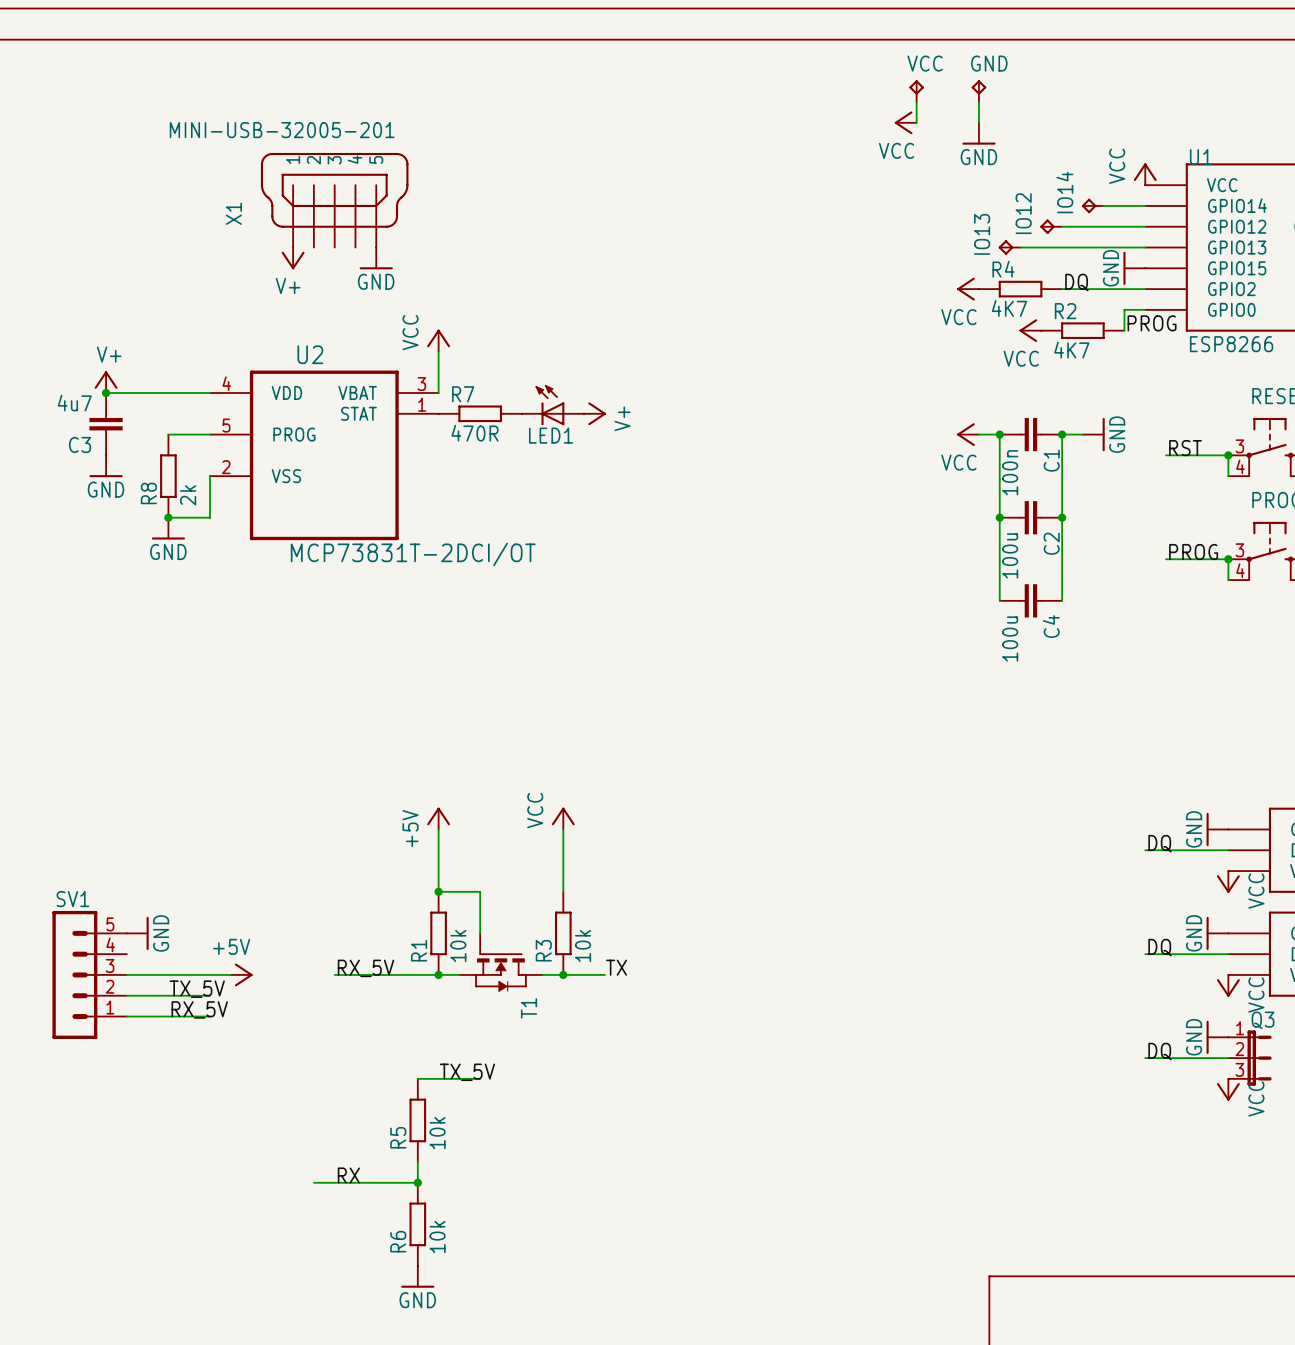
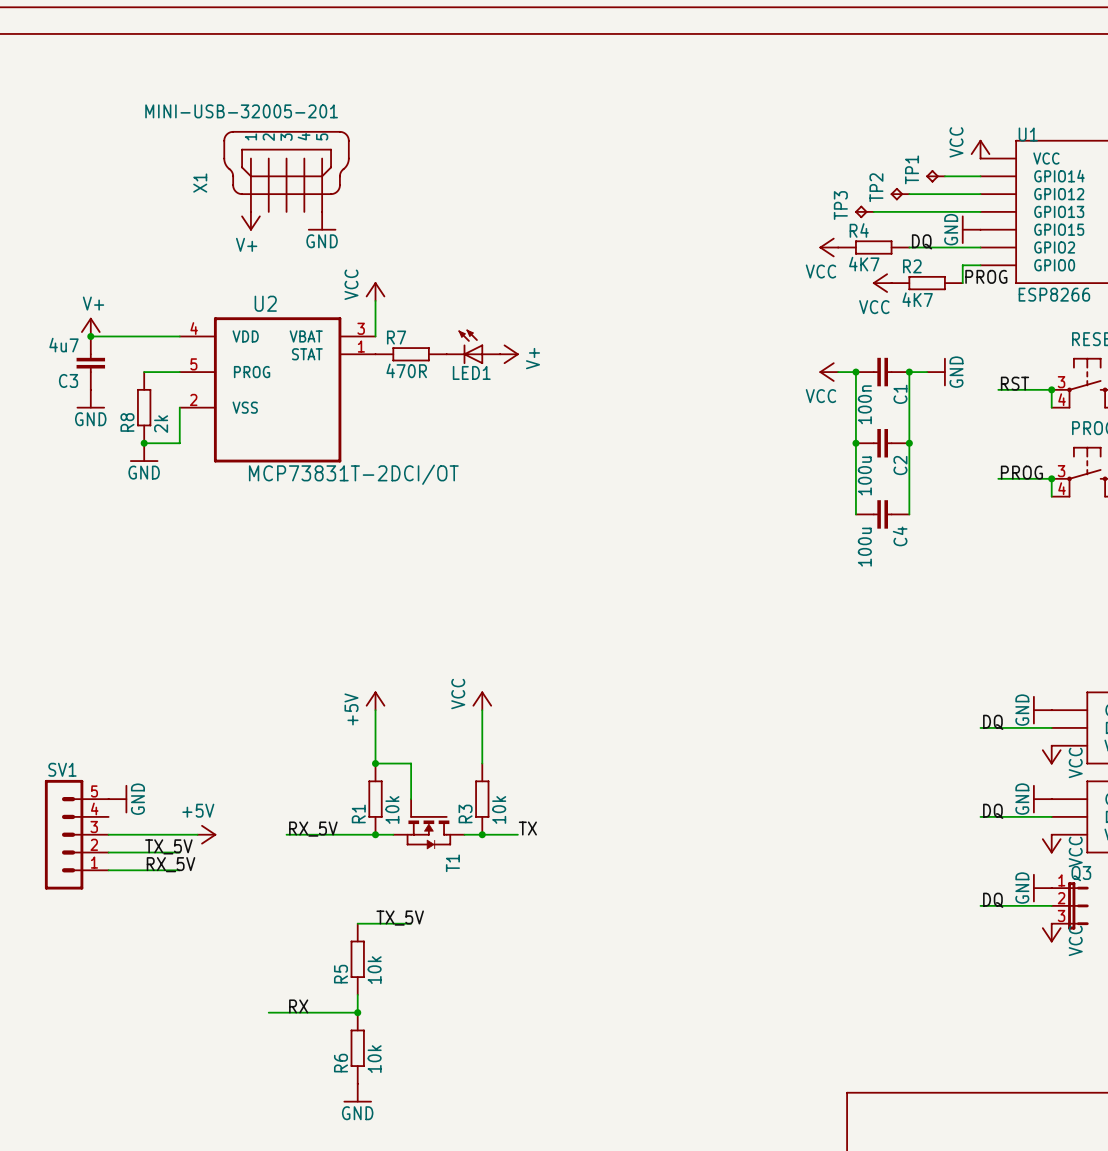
VCC: (916, 91) -> none
GND: (978, 91) -> none
wire: (916, 102) (916, 122) -> none
wire: (978, 102) (978, 122) -> none
power symbol: VCC (905, 122) -> none
power symbol: GND (978, 133) -> none
IO14 name: IO14 (1064, 192) -> TP1 (912, 169)
IO12 name: IO12 (1023, 213) -> TP2 (876, 187)
IO13 name: IO13 (982, 234) -> TP3 (840, 205)

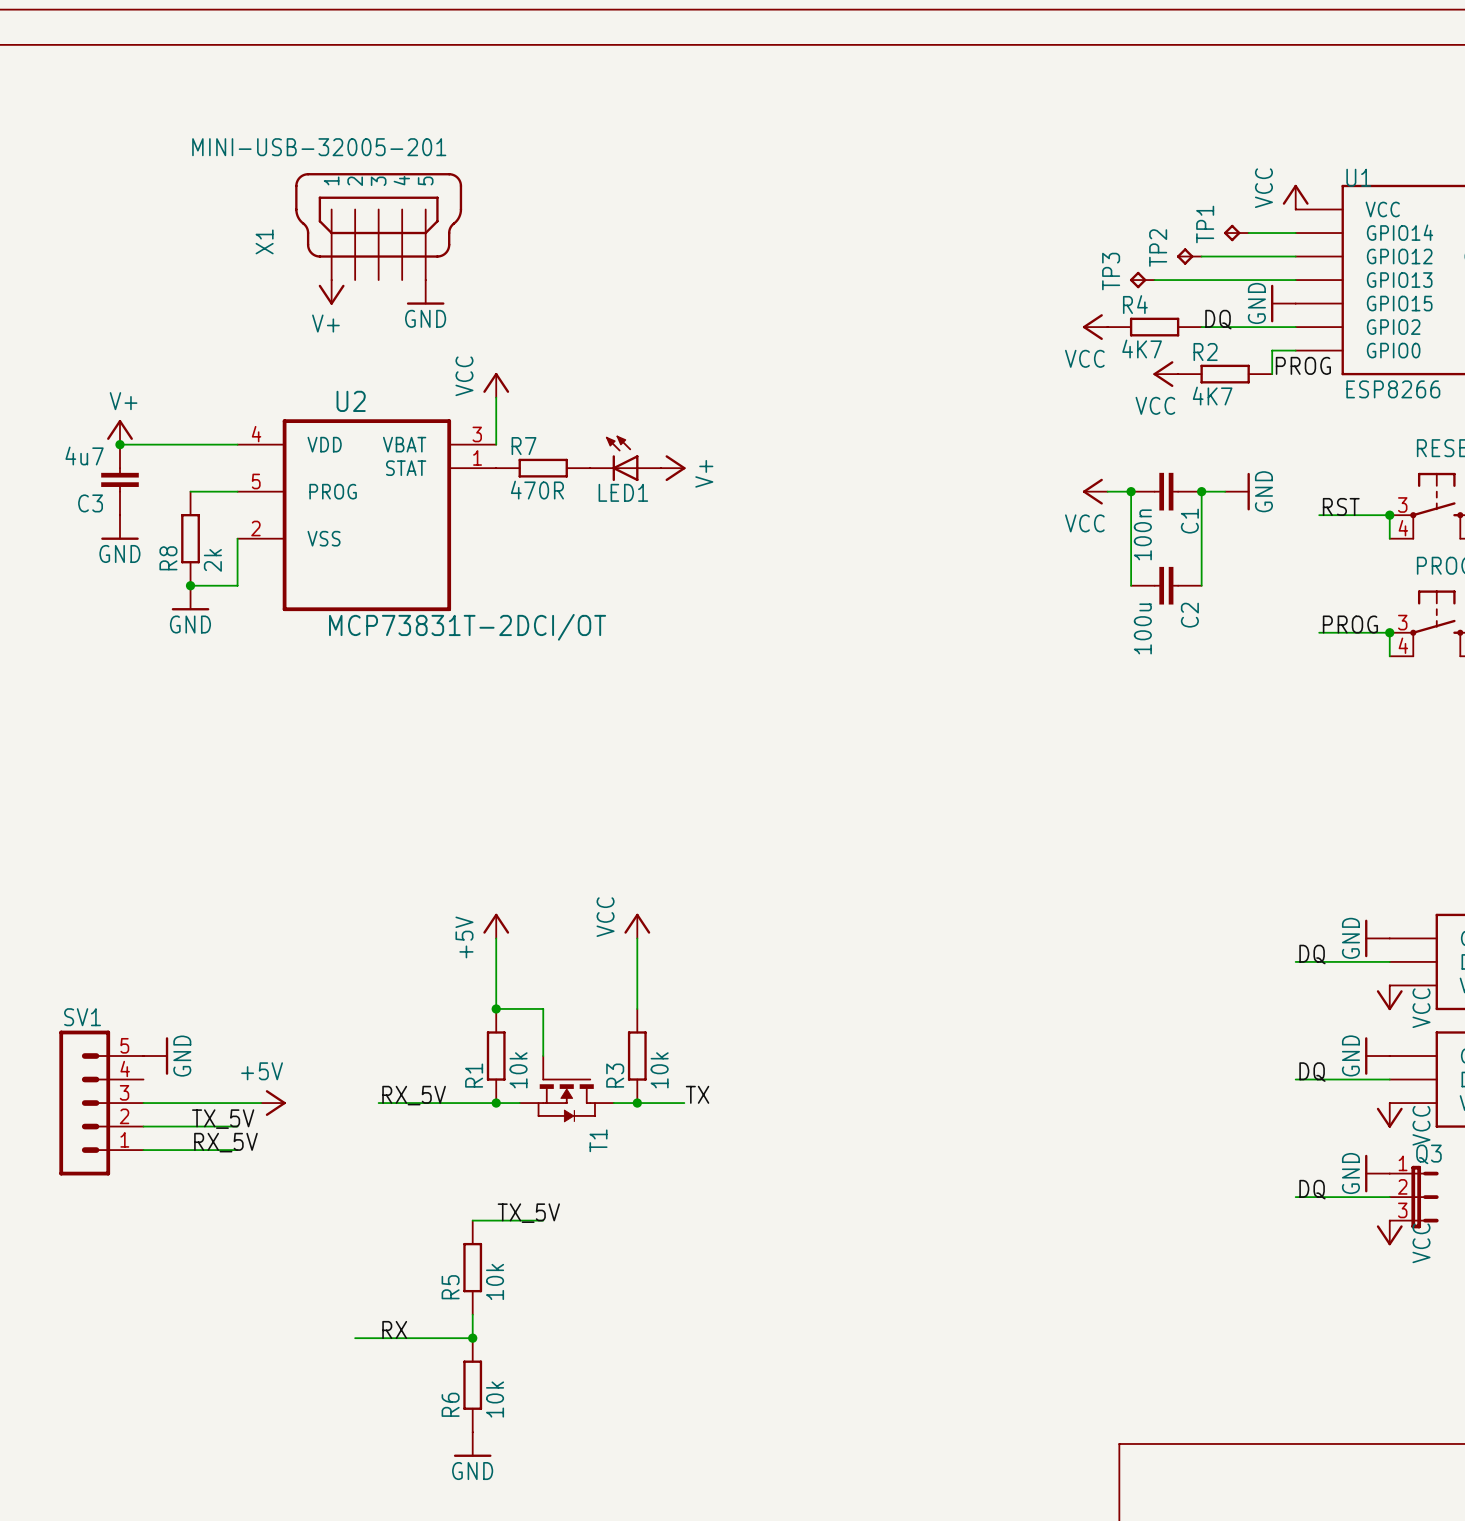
wire: (855, 443) (855, 514) -> none
junction: (855, 443) -> none
wire: (909, 443) (909, 514) -> none
junction: (909, 443) -> none
C4: 100u (882, 514) -> none

